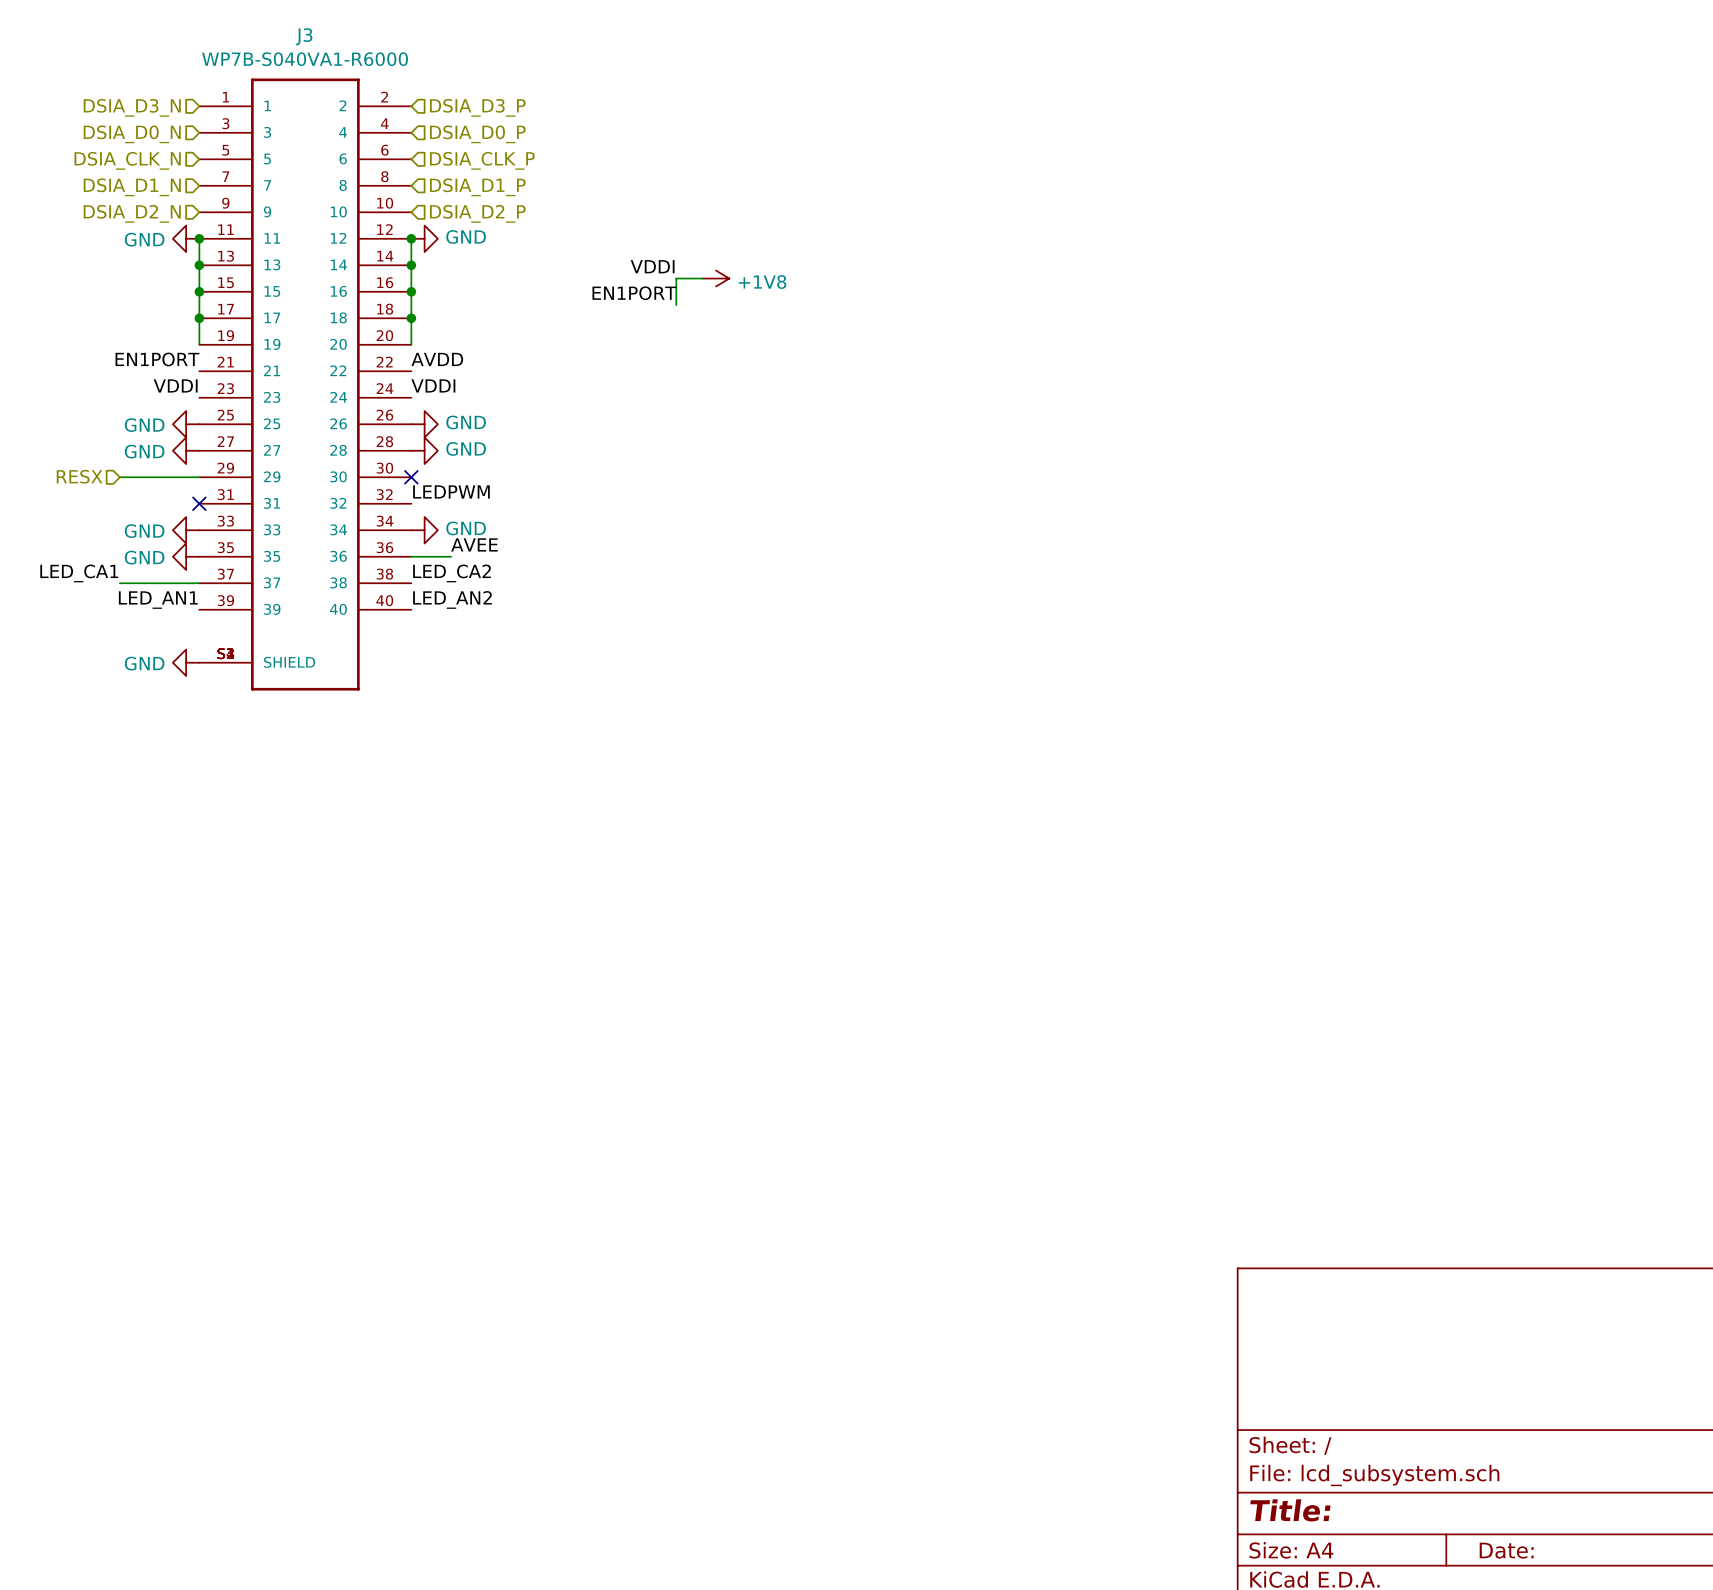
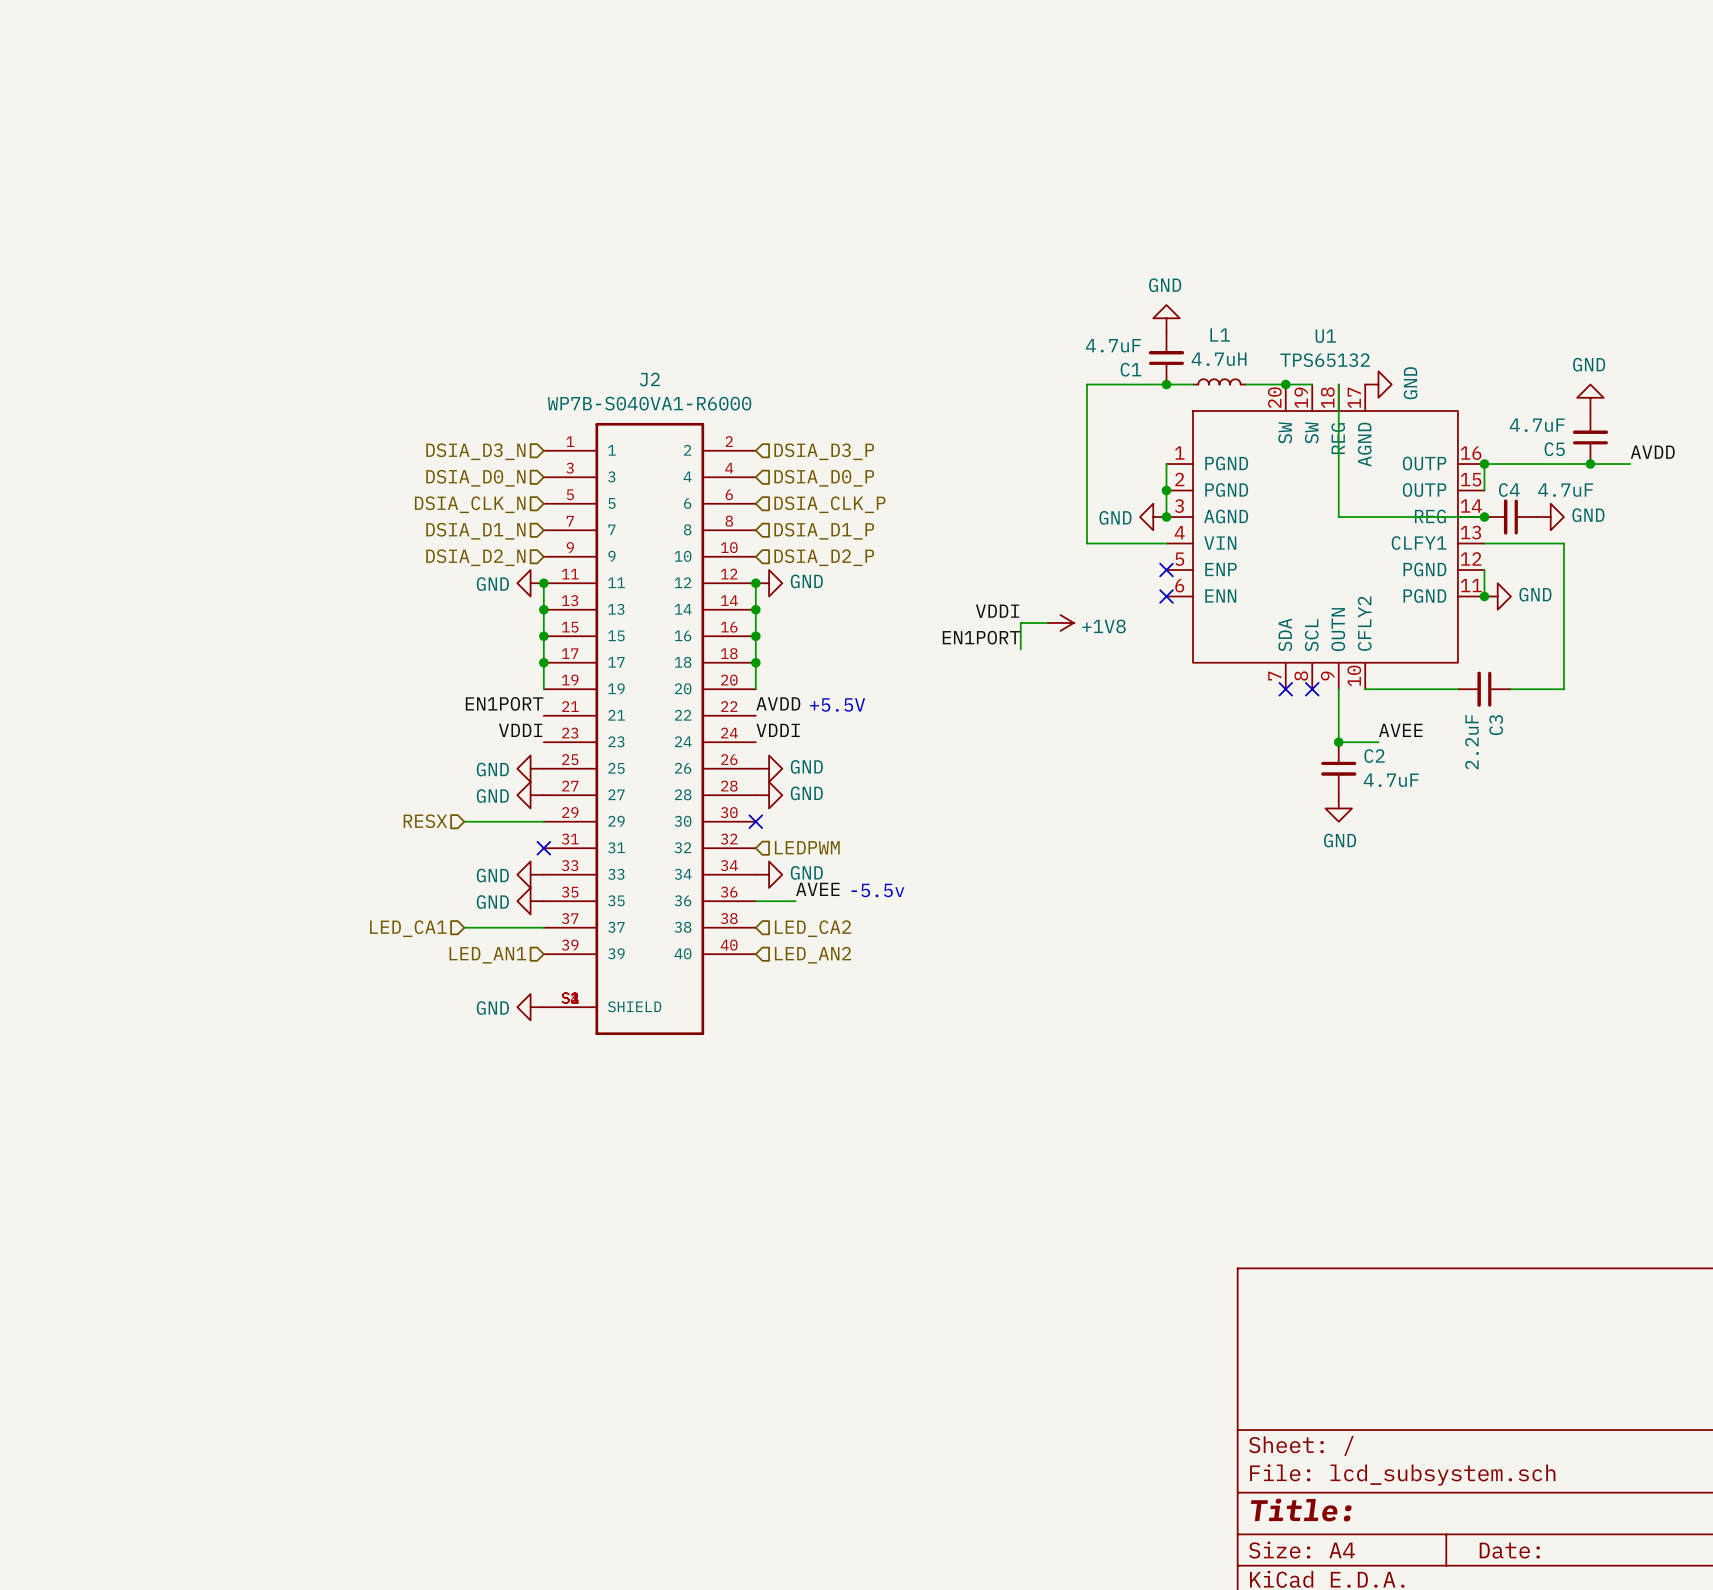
hierarchical label: DSIA_D3_N (132, 107) -> none
hierarchical label: DSIA_D3_P (477, 107) -> none
hierarchical label: DSIA_D0_N (132, 134) -> none
hierarchical label: DSIA_D0_P (477, 134) -> none
hierarchical label: DSIA_CLK_N (127, 160) -> none
hierarchical label: DSIA_CLK_P (482, 160) -> none
hierarchical label: DSIA_D1_N (132, 187) -> none
hierarchical label: DSIA_D1_P (477, 187) -> none
hierarchical label: DSIA_D2_N (132, 213) -> none
hierarchical label: DSIA_D2_P (477, 213) -> none
power symbol: GND (186, 238) -> none
wire: (199, 238) (199, 344) -> none
junction: (199, 238) -> none
wire: (411, 238) (411, 344) -> none
junction: (411, 238) -> none
power symbol: GND (424, 238) -> none
junction: (199, 265) -> none
junction: (411, 265) -> none
label: VDDI (652, 266) -> none
wire: (702, 278) (676, 278) (676, 305) -> none
power symbol: +1V8 (716, 278) -> none
junction: (199, 291) -> none
junction: (411, 291) -> none
label: EN1PORT (634, 293) -> none
junction: (199, 318) -> none
junction: (411, 318) -> none
power symbol: none -> GND (1166, 318)
C1: none -> 4.7uF (1166, 358)
label: EN1PORT (157, 359) -> none
label: AVDD (437, 359) -> none
L1: none -> 4.7uH (1219, 381)
J3: WP7B-S040VA1-R6000 (305, 384) -> none
junction: none -> (1166, 384)
wire: none -> (1193, 384) (1087, 384) (1087, 543) (1166, 543)
wire: none -> (1245, 384) (1312, 384)
junction: none -> (1285, 384)
wire: none -> (1338, 384) (1338, 517) (1484, 517)
power symbol: none -> GND (1378, 384)
label: VDDI (175, 385) -> none
label: VDDI (433, 385) -> none
power symbol: none -> GND (1590, 397)
power symbol: GND (186, 424) -> none
power symbol: GND (424, 424) -> none
C5: none -> 4.7uF (1590, 437)
power symbol: GND (186, 450) -> none
power symbol: GND (424, 450) -> none
hierarchical label: none -> DSIA_D3_N (475, 451)
hierarchical label: none -> DSIA_D3_P (824, 451)
label: none -> AVDD (1652, 452)
wire: none -> (1166, 464) (1166, 517)
junction: none -> (1484, 464)
junction: none -> (1590, 464)
wire: none -> (1630, 464) (1484, 464) (1484, 490)
hierarchical label: RESX (79, 476) -> none
wire: (119, 477) (199, 477) -> none
no-connect mark: (411, 477) -> none
hierarchical label: none -> DSIA_D0_N (475, 478)
hierarchical label: none -> DSIA_D0_P (824, 478)
junction: none -> (1166, 490)
label: LEDPWM (451, 491) -> none
no-connect mark: (199, 503) -> none
hierarchical label: none -> DSIA_CLK_N (470, 504)
hierarchical label: none -> DSIA_CLK_P (829, 504)
power symbol: none -> GND (1153, 517)
junction: none -> (1166, 517)
junction: none -> (1484, 517)
C4: none -> 4.7uF (1510, 517)
power symbol: none -> GND (1550, 517)
power symbol: GND (186, 530) -> none
power symbol: GND (424, 530) -> none
hierarchical label: none -> DSIA_D1_N (475, 531)
hierarchical label: none -> DSIA_D1_P (824, 531)
U1: none -> TPS65132 (1325, 536)
wire: none -> (1484, 543) (1563, 543) (1563, 689) (1510, 689)
label: AVEE (474, 544) -> none
power symbol: GND (186, 556) -> none
wire: (411, 556) (451, 556) -> none
hierarchical label: none -> DSIA_D2_N (475, 557)
hierarchical label: none -> DSIA_D2_P (824, 557)
no-connect mark: none -> (1166, 570)
wire: none -> (1484, 570) (1484, 596)
label: LED_CA1 (79, 573) -> none
label: LED_CA2 (452, 573) -> none
wire: (119, 583) (199, 583) -> none
power symbol: none -> GND (530, 583)
wire: none -> (543, 583) (543, 689)
junction: none -> (543, 583)
wire: none -> (755, 583) (755, 689)
junction: none -> (755, 583)
power symbol: none -> GND (769, 583)
no-connect mark: none -> (1166, 596)
junction: none -> (1484, 596)
power symbol: none -> GND (1497, 596)
label: LED_AN2 (452, 599) -> none
label: LED_AN1 (158, 600) -> none
junction: none -> (543, 609)
junction: none -> (755, 609)
label: none -> VDDI (997, 611)
wire: none -> (1047, 622) (1020, 622) (1020, 649)
power symbol: none -> +1V8 (1060, 622)
junction: none -> (543, 636)
junction: none -> (755, 636)
label: none -> EN1PORT (981, 637)
power symbol: GND (186, 662) -> none
junction: none -> (543, 662)
junction: none -> (755, 662)
no-connect mark: none -> (1285, 689)
no-connect mark: none -> (1312, 689)
wire: none -> (1338, 689) (1338, 742) (1378, 742)
wire: none -> (1365, 689) (1457, 689)
C3: none -> 2.2uF (1484, 689)
label: none -> EN1PORT (504, 703)
label: none -> AVDD (778, 703)
text: none -> +5.5V (837, 704)
J2: none -> WP7B-S040VA1-R6000 (649, 728)
label: none -> VDDI (520, 730)
label: none -> VDDI (778, 730)
label: none -> AVEE (1400, 730)
junction: none -> (1338, 742)
power symbol: none -> GND (530, 768)
power symbol: none -> GND (769, 768)
C2: none -> 4.7uF (1338, 768)
power symbol: none -> GND (530, 795)
power symbol: none -> GND (769, 795)
power symbol: none -> GND (1338, 808)
hierarchical label: none -> RESX (425, 821)
wire: none -> (464, 821) (543, 821)
no-connect mark: none -> (755, 821)
hierarchical label: none -> LEDPWM (807, 847)
no-connect mark: none -> (543, 848)
power symbol: none -> GND (530, 874)
power symbol: none -> GND (769, 874)
label: none -> AVEE (817, 889)
text: none -> -5.5v (877, 890)
power symbol: none -> GND (530, 901)
wire: none -> (755, 901) (795, 901)
wire: none -> (464, 927) (543, 927)
hierarchical label: none -> LED_CA1 (408, 928)
hierarchical label: none -> LED_CA2 (813, 928)
hierarchical label: none -> LED_AN1 (487, 955)
hierarchical label: none -> LED_AN2 (813, 955)
power symbol: none -> GND (530, 1007)

